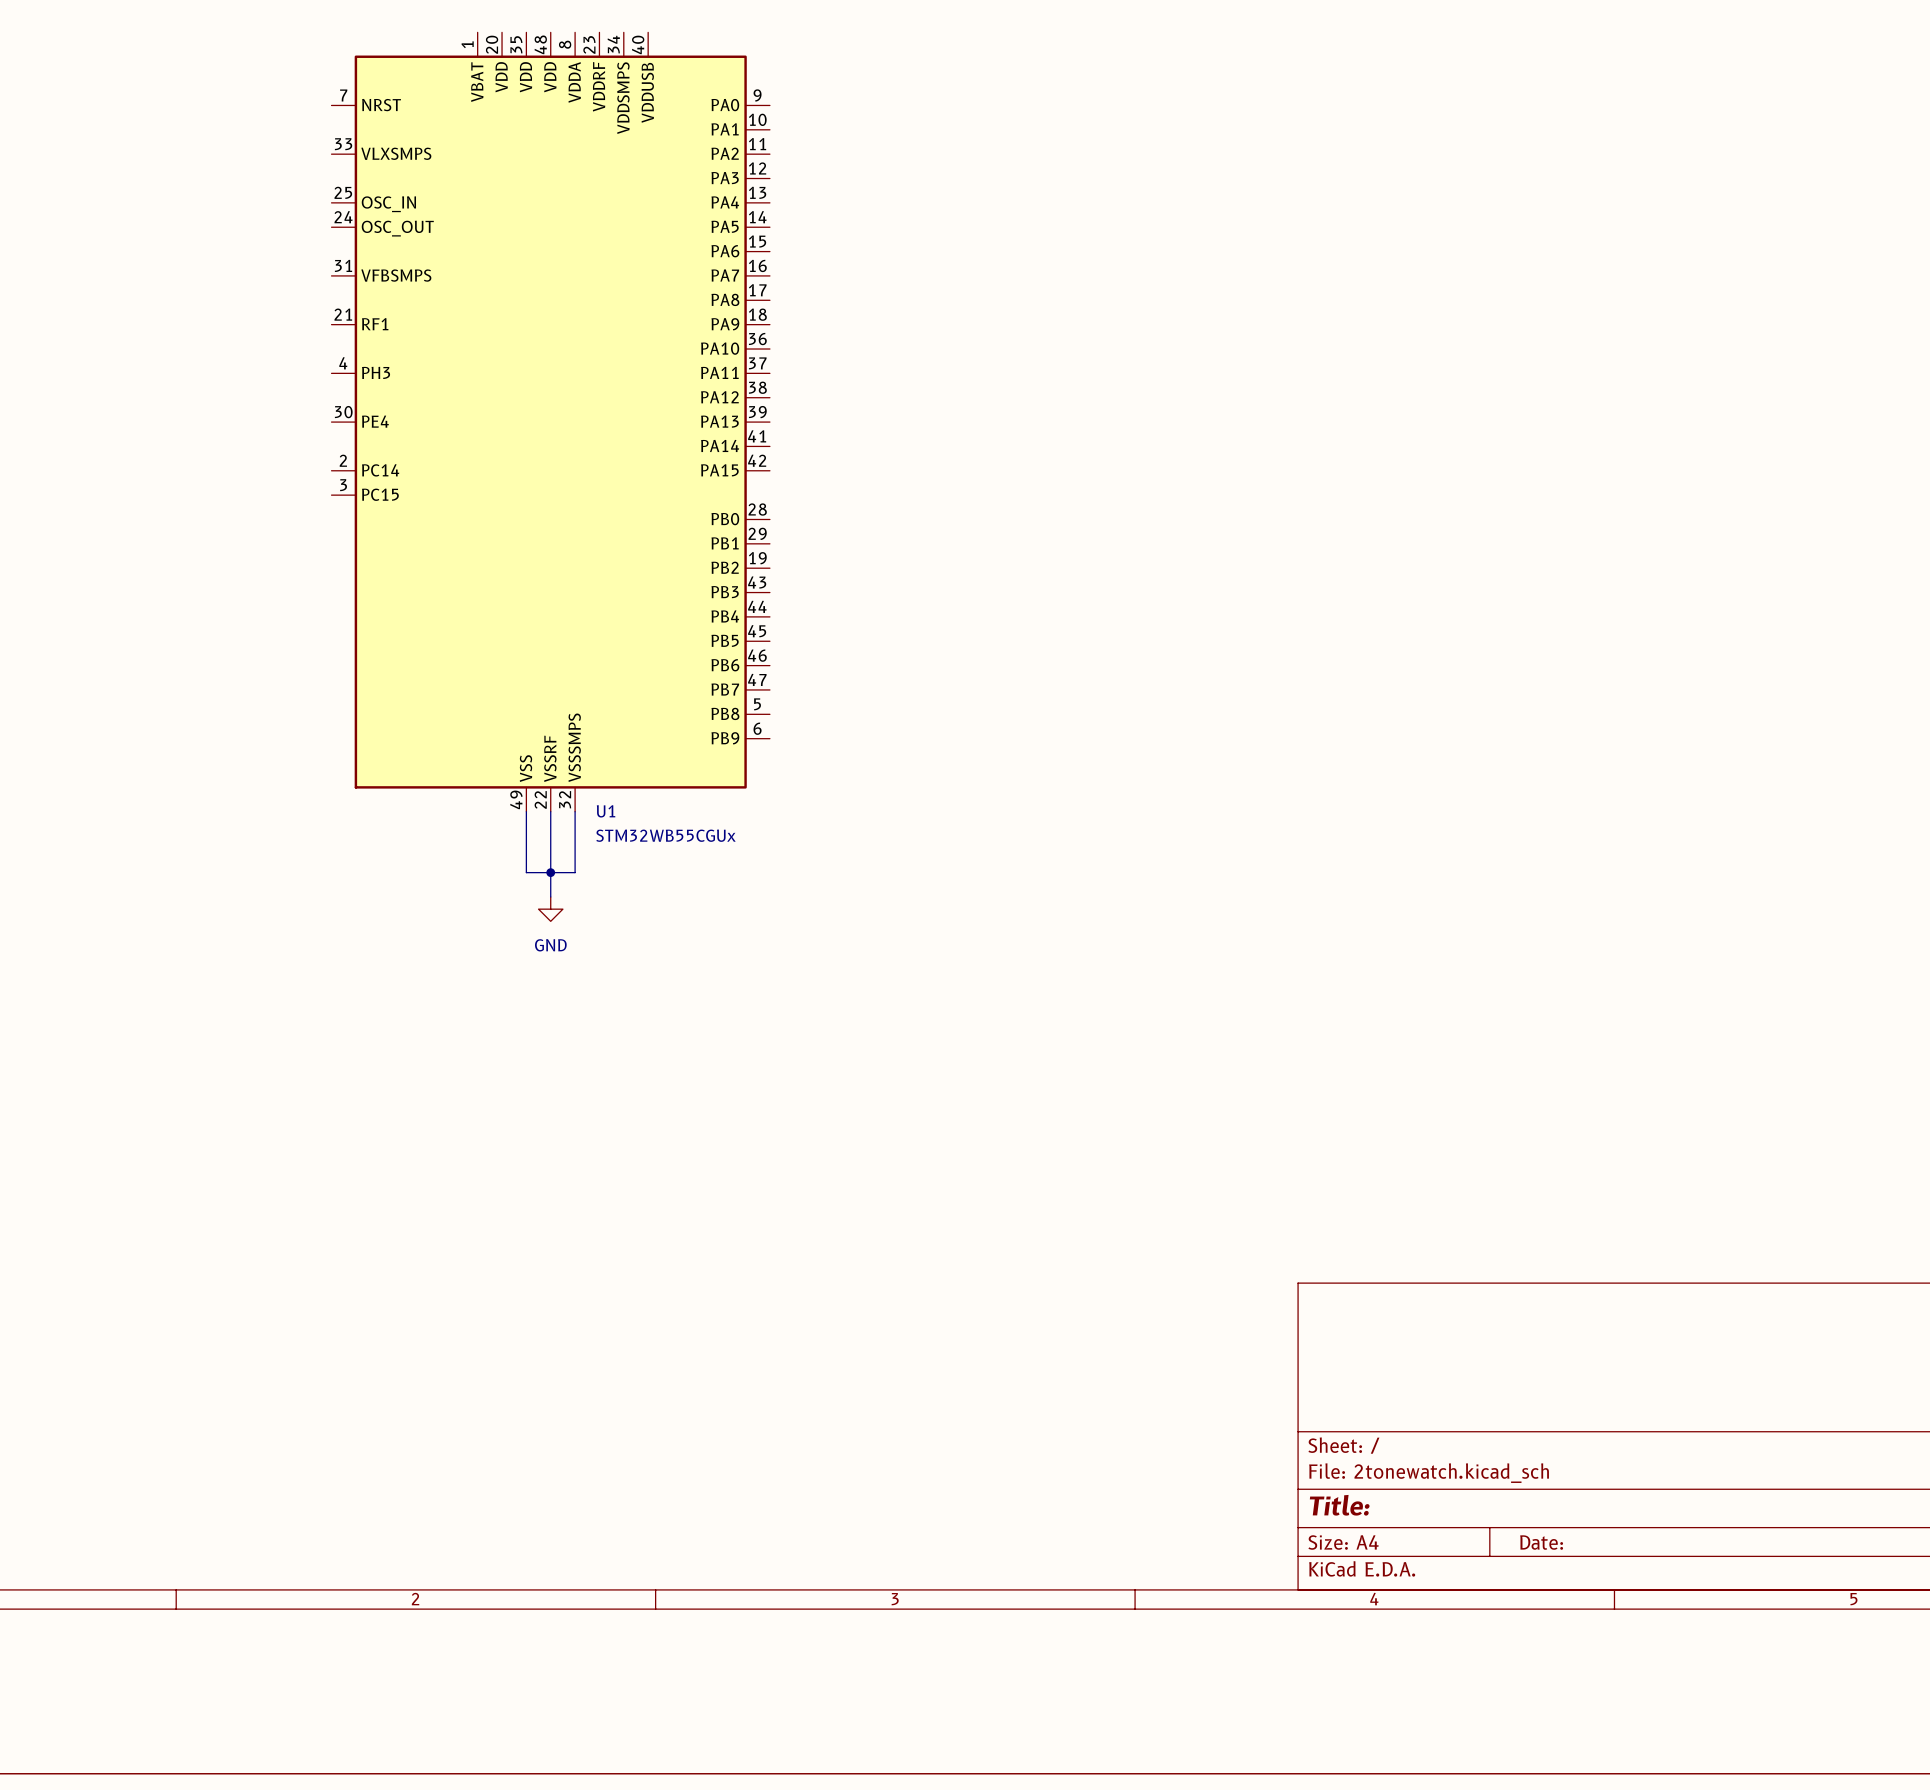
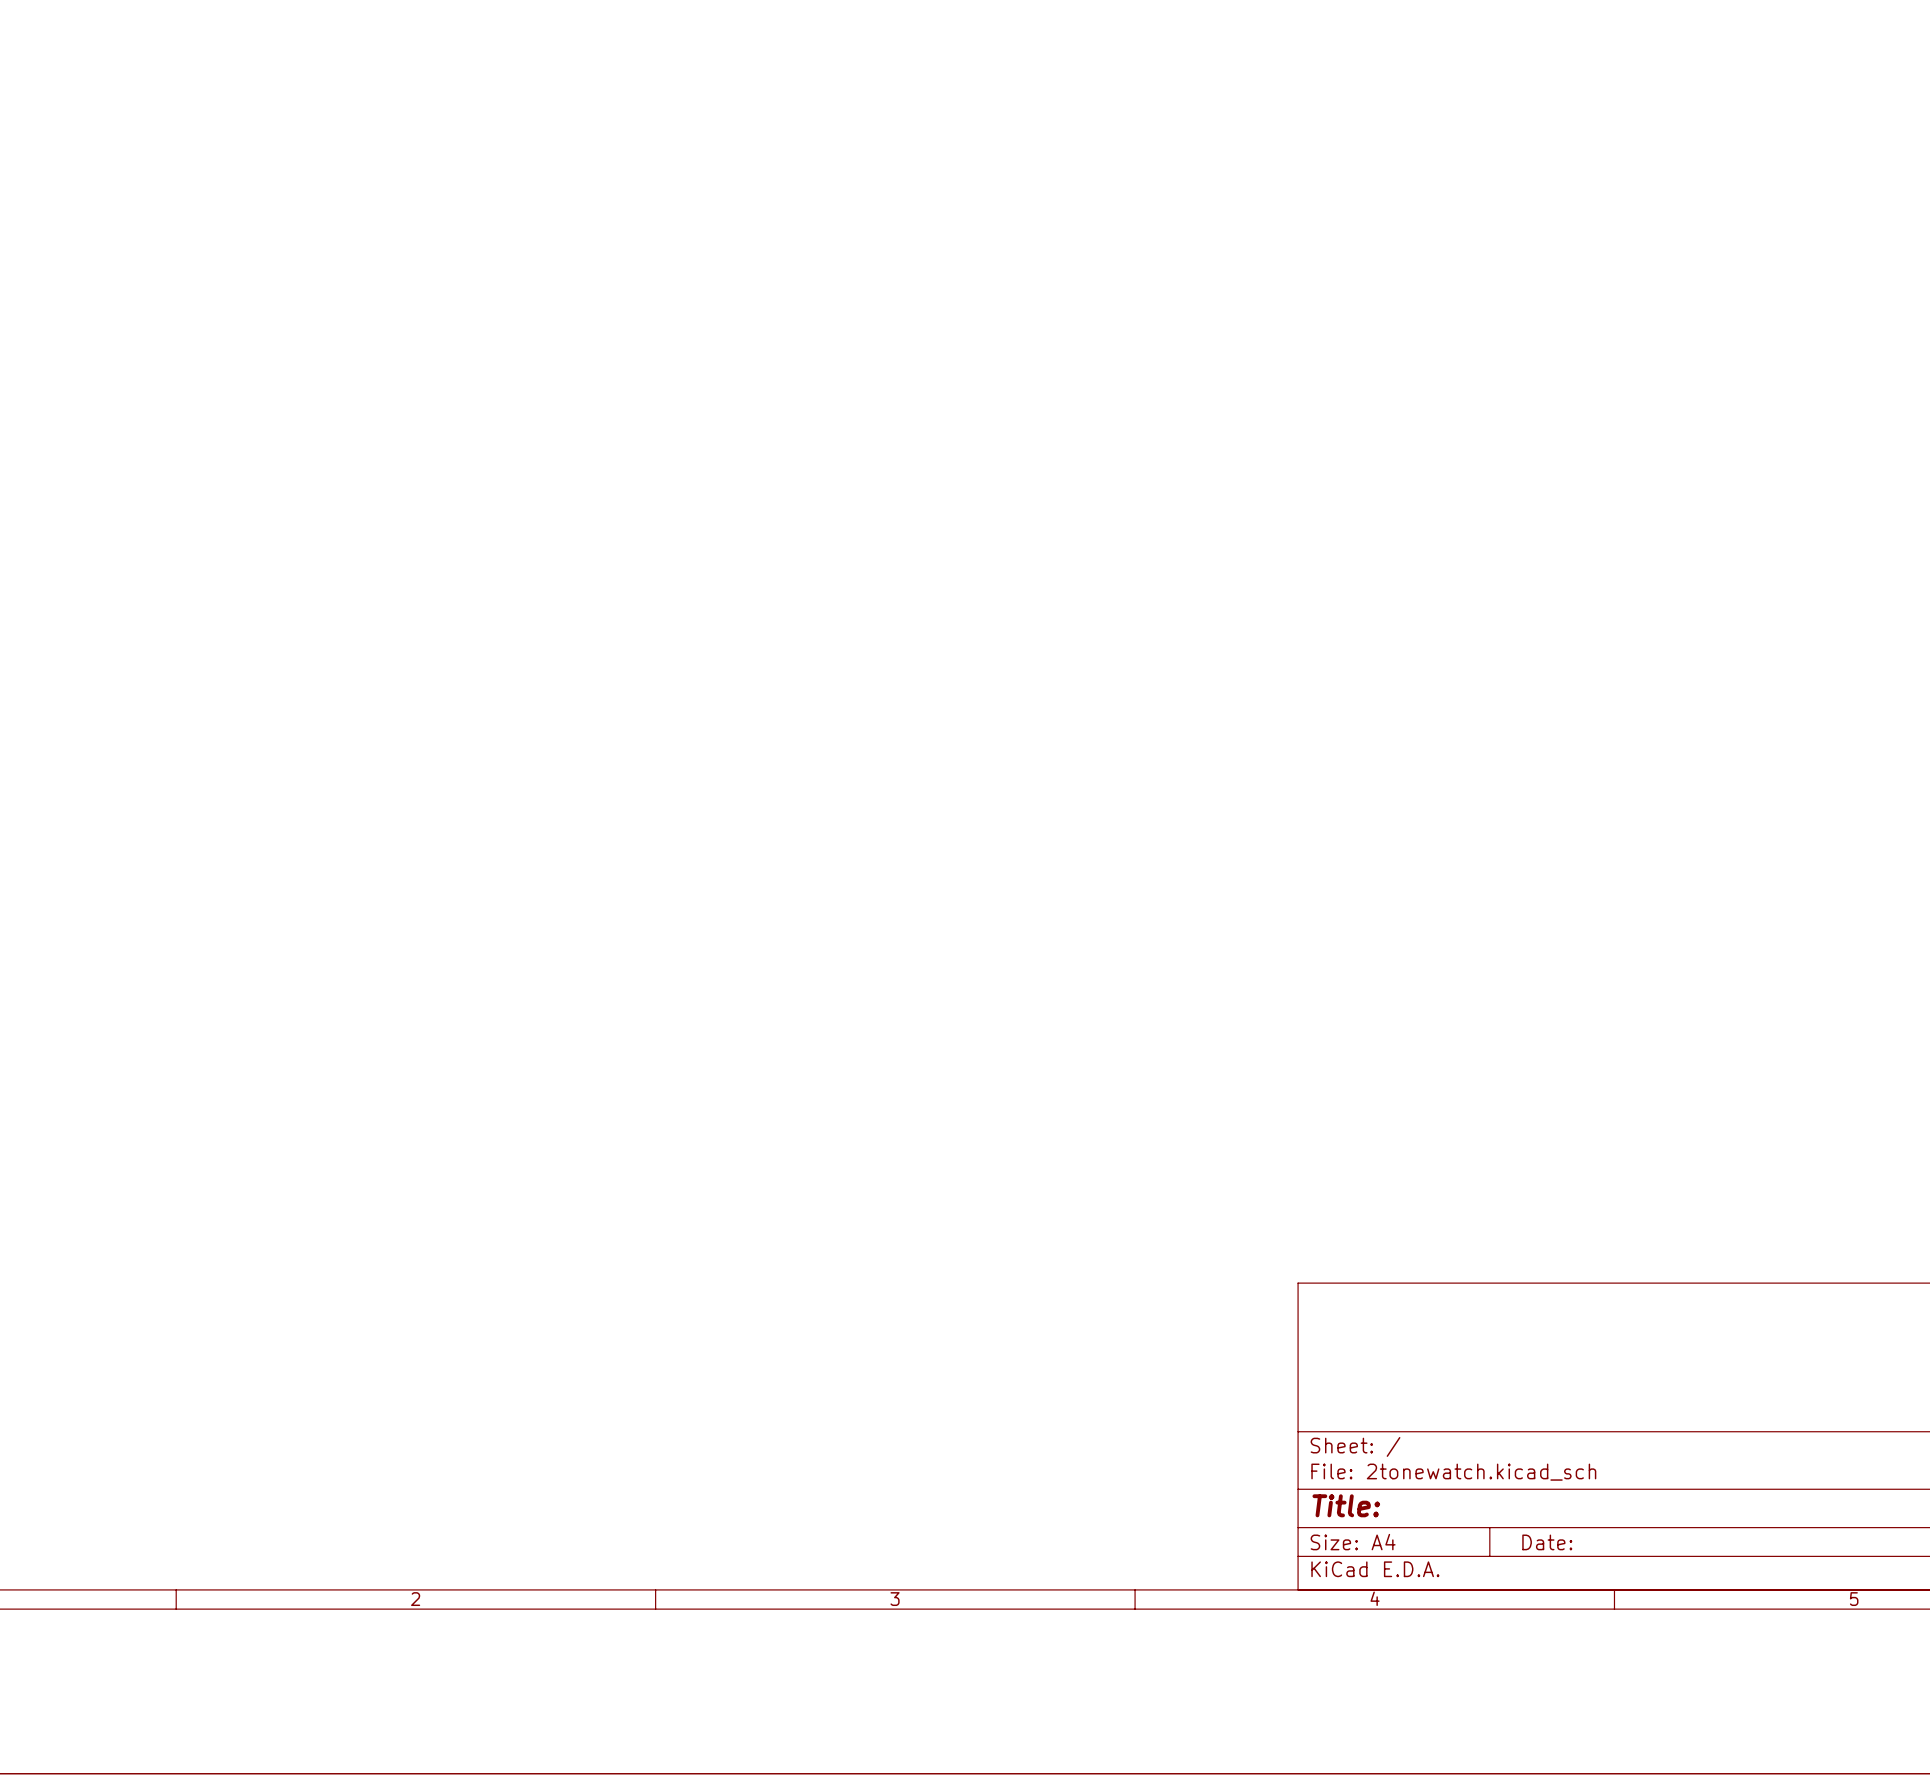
U1: STM32WB55CGUx (550, 422) -> none
wire: (526, 811) (526, 872) (575, 872) (575, 811) -> none
wire: (550, 811) (550, 896) -> none
junction: (550, 872) -> none
power symbol: GND (550, 909) -> none

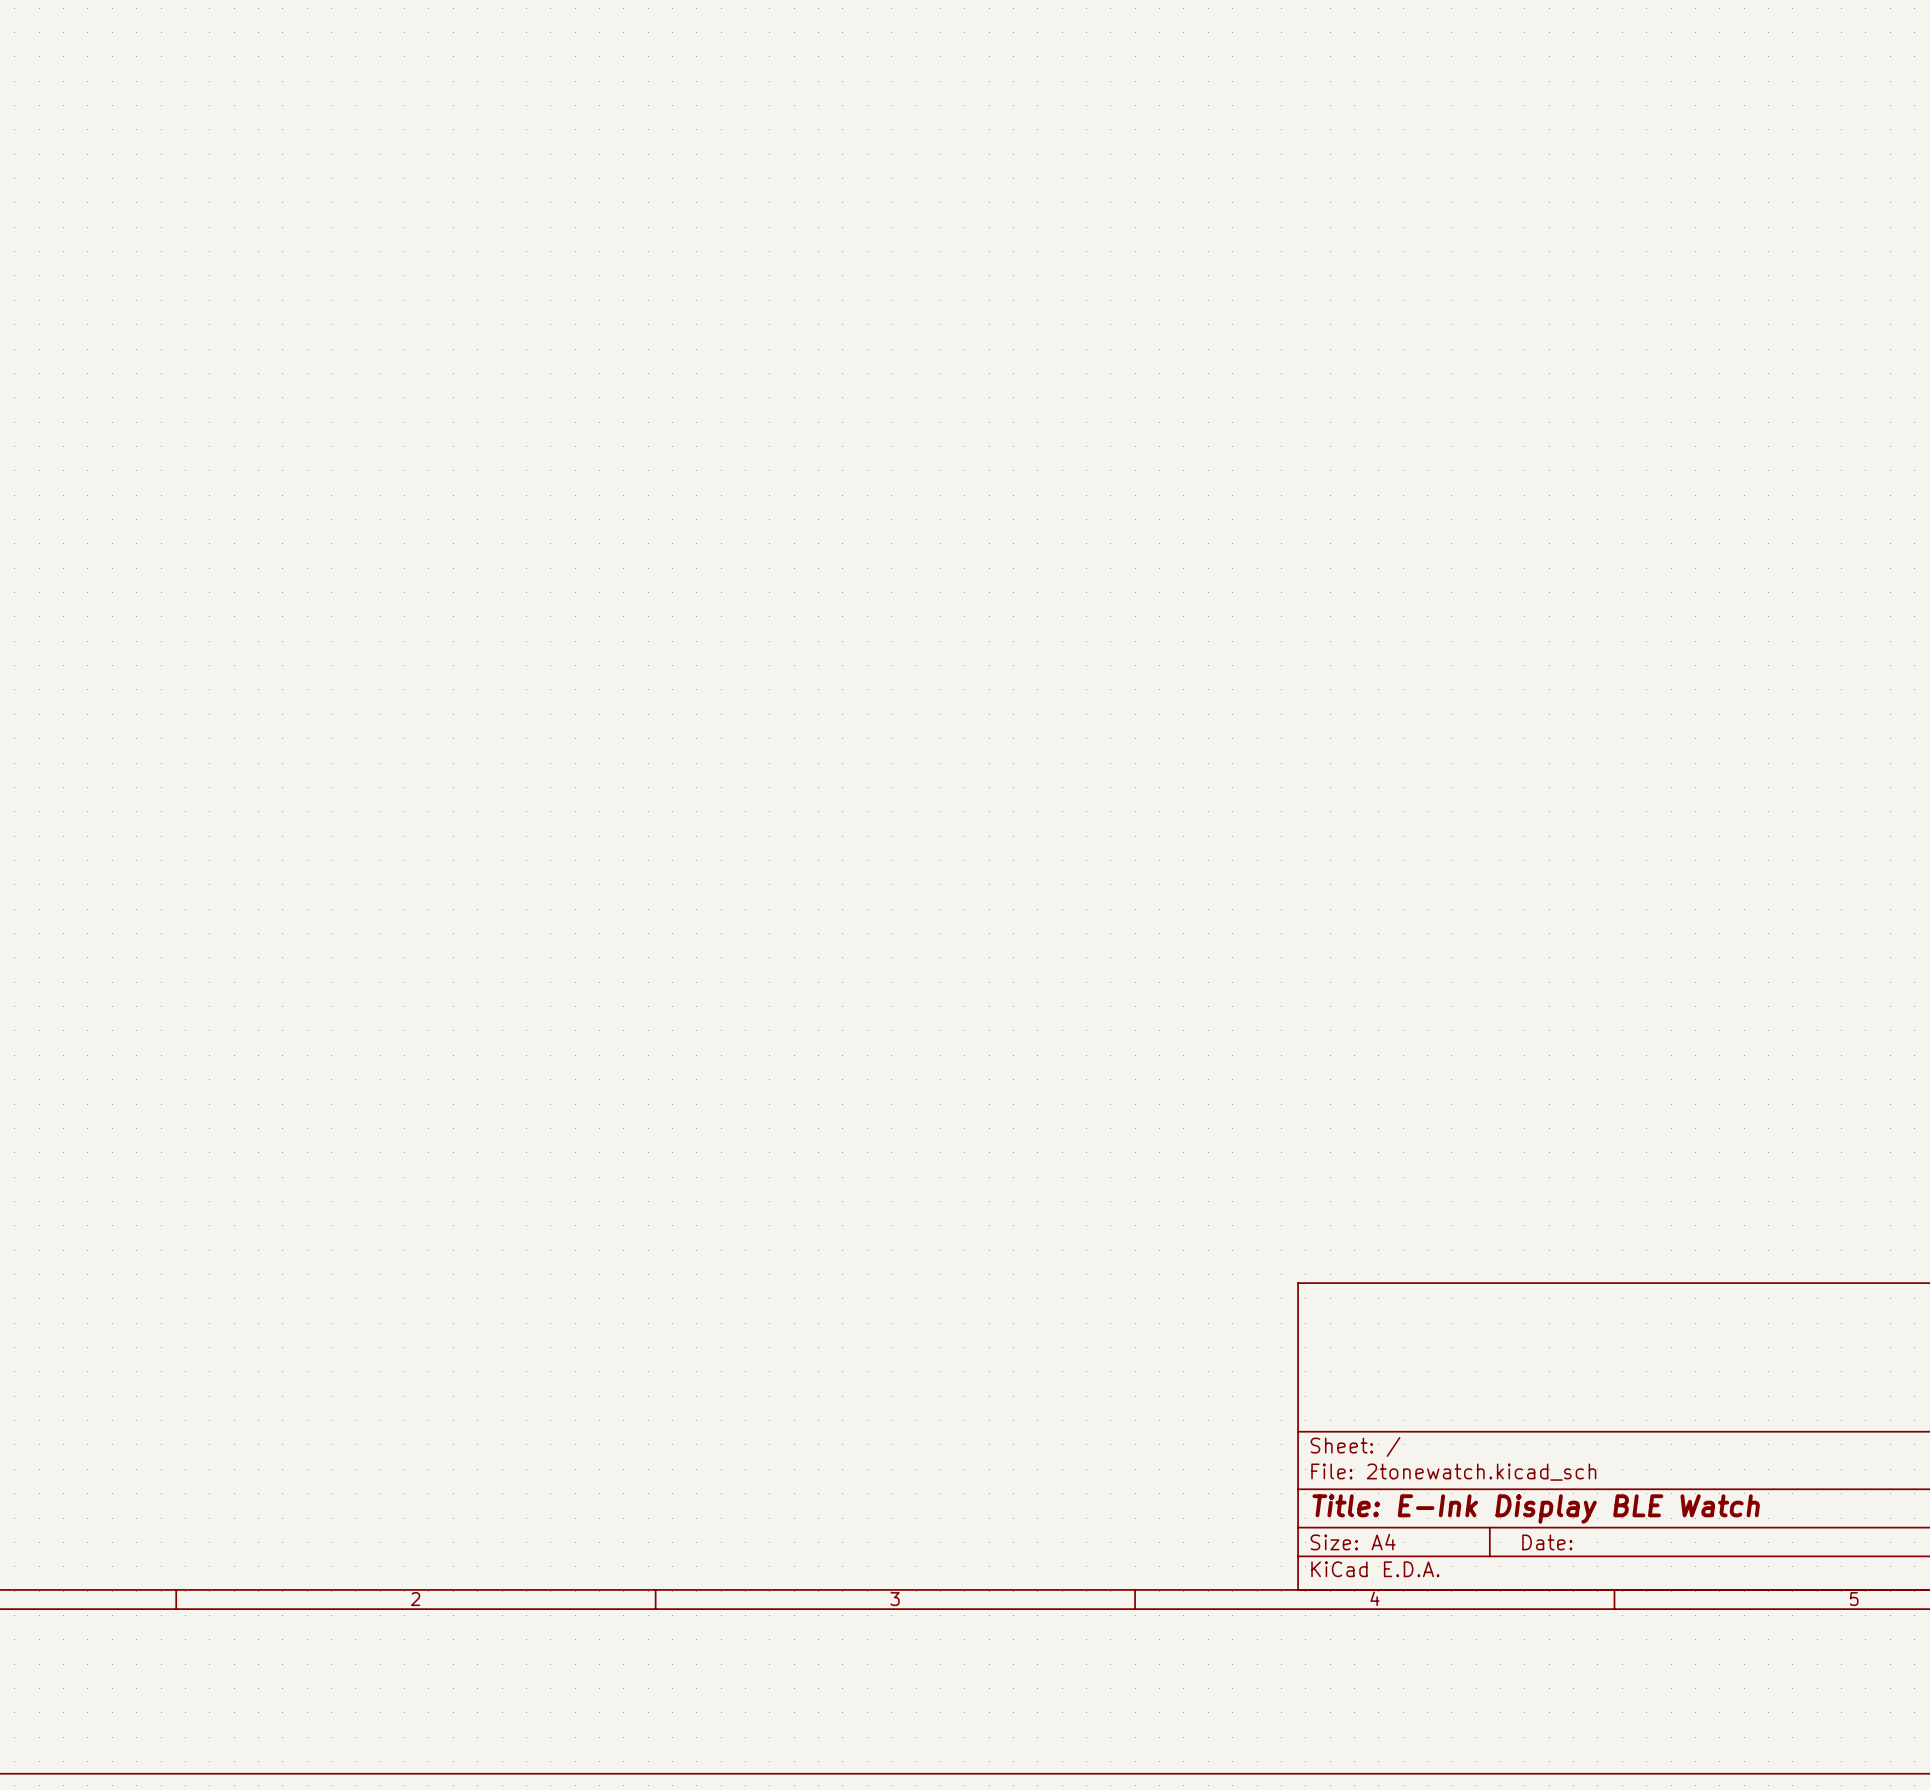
title block: Title: (1346, 1505) -> Title: E-Ink Display BLE Watch (1536, 1509)

